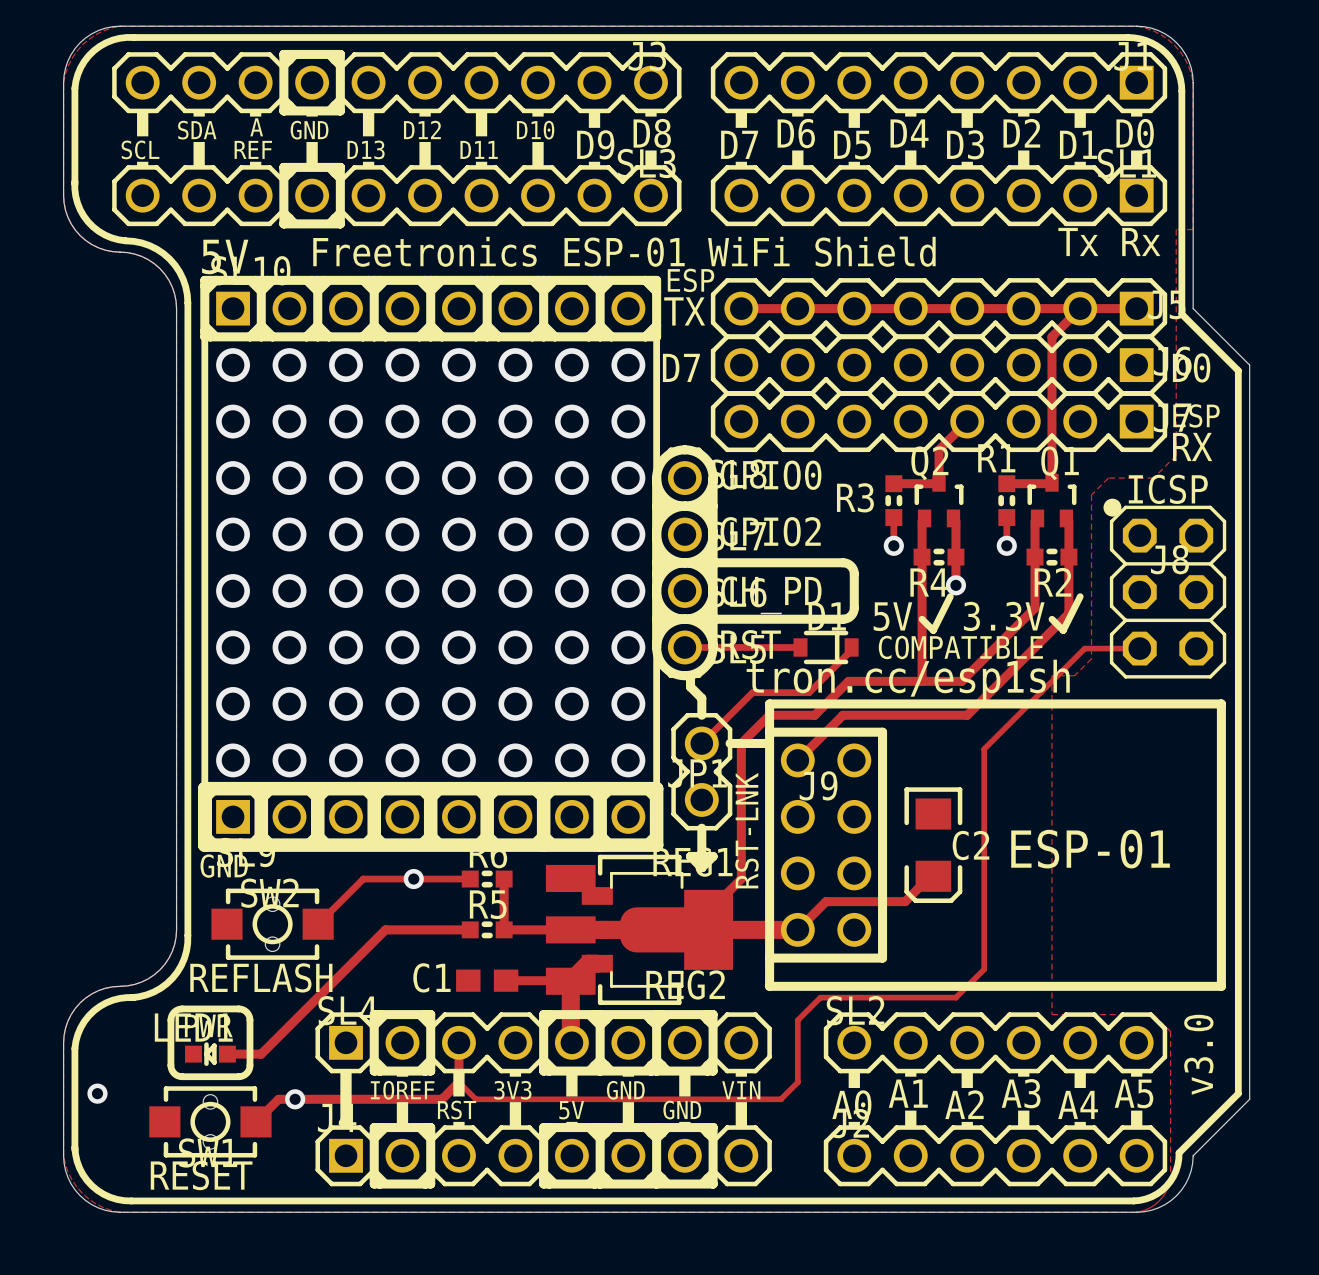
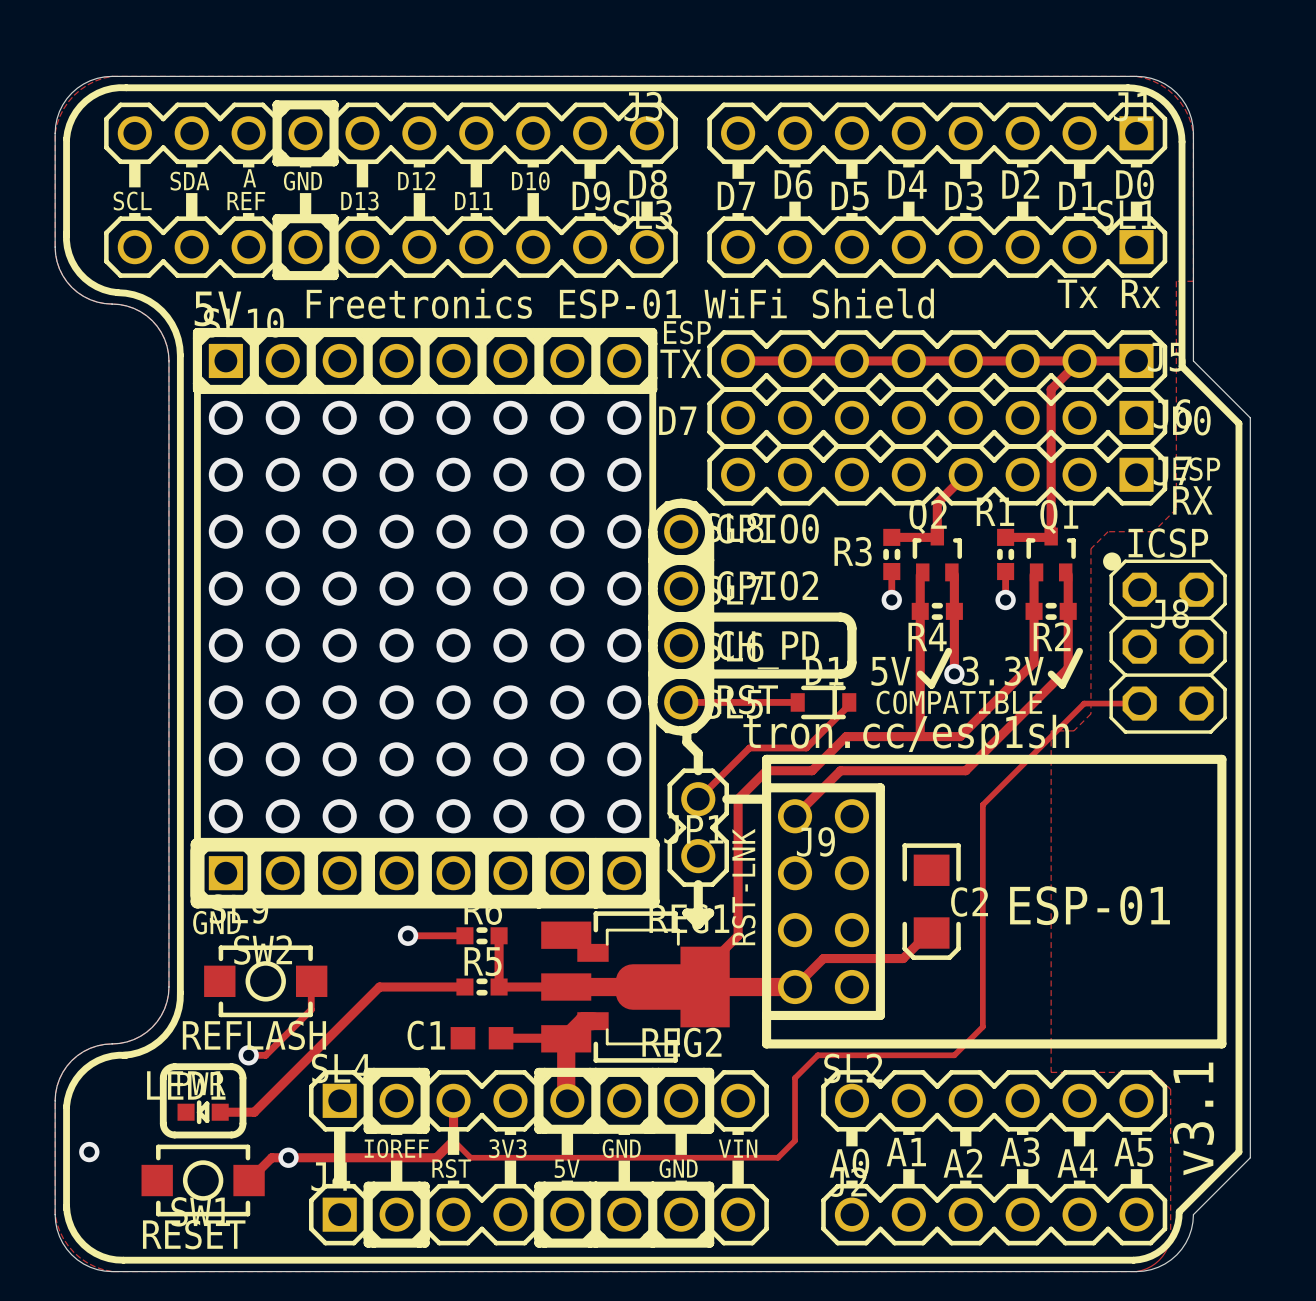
track: none -> (954, 639) (954, 673)
via position: (955, 585) -> (954, 673)
track: (413, 879) (363, 879) (318, 924) -> (248, 1055) (265, 1055) (311, 1009) (311, 981)
part footprint: [211, 888, 334, 960] -> [204, 945, 328, 1018]
via: none -> (248, 1055)
text: v3.0 (1198, 1054) -> v3.1 (1193, 1118)
part footprint: [149, 1086, 272, 1158] -> [141, 1144, 265, 1217]

